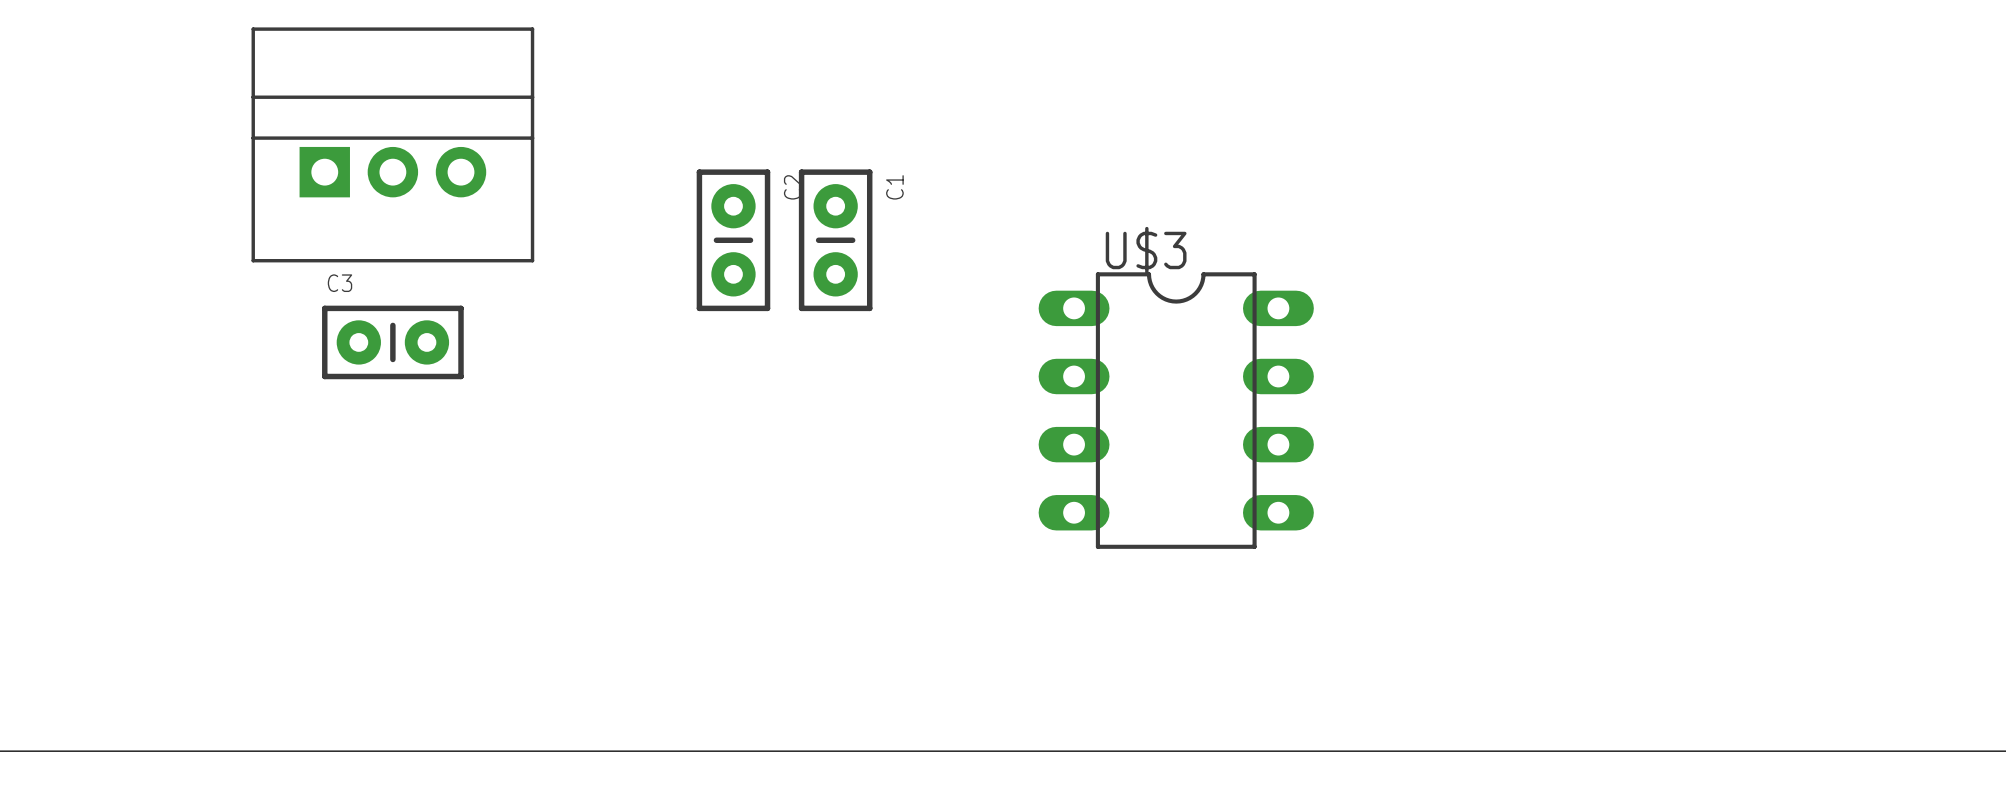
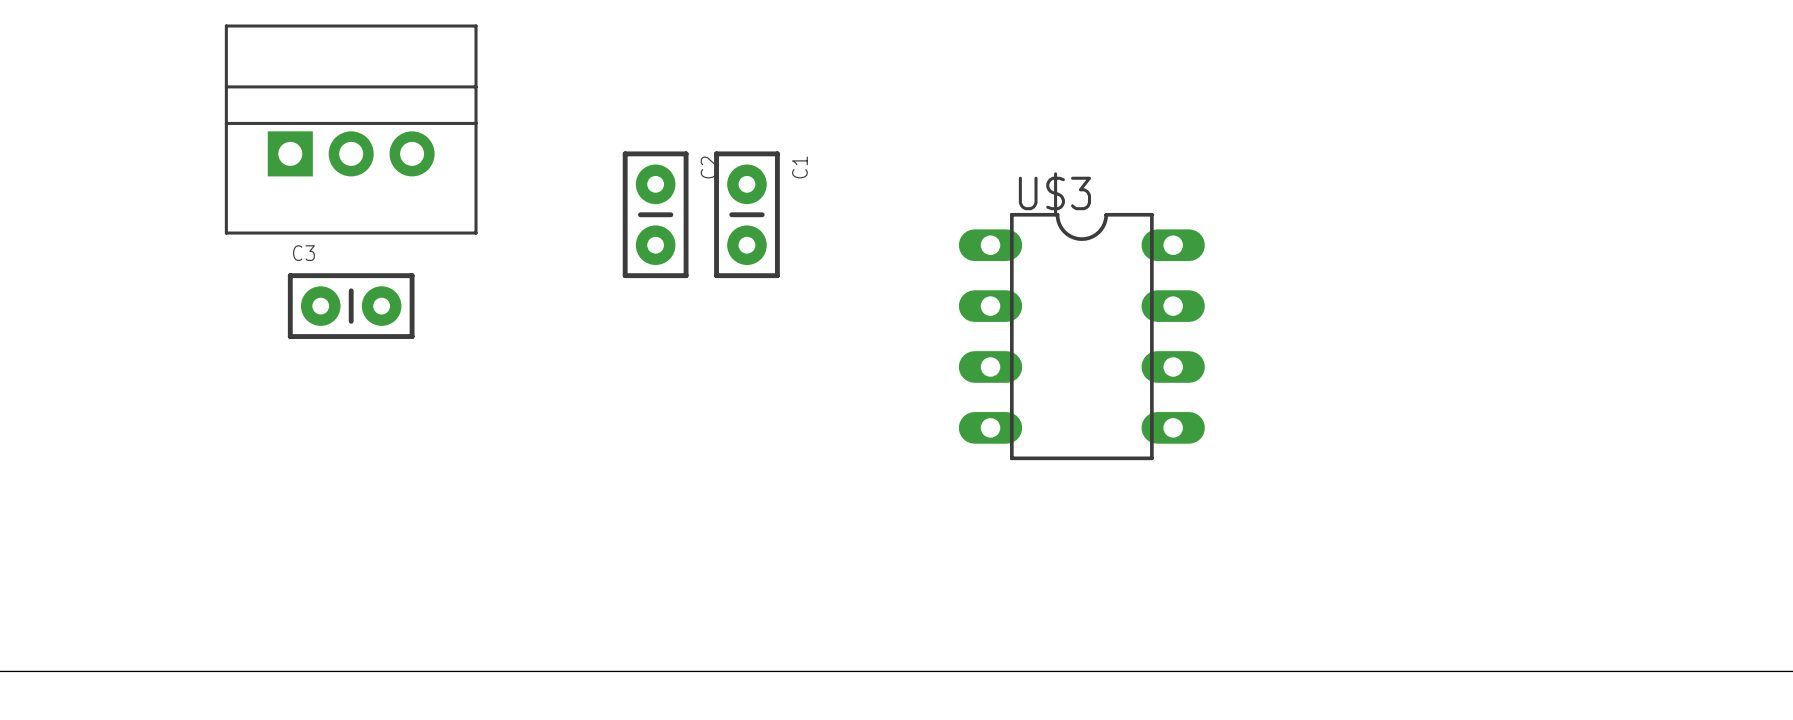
U$3 position: (1176, 410) -> (1081, 336)

